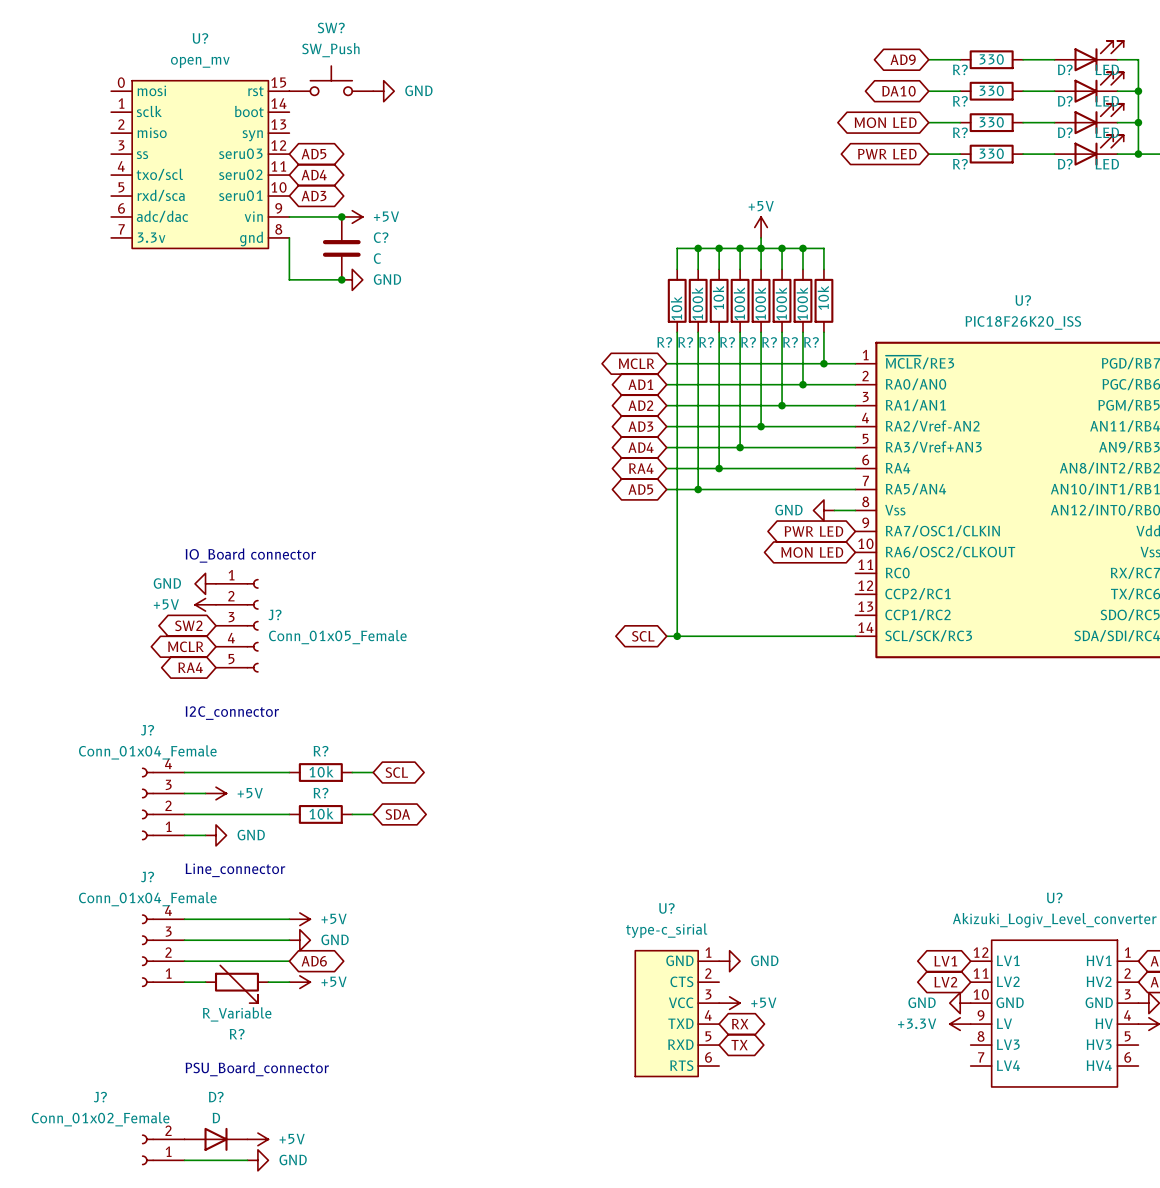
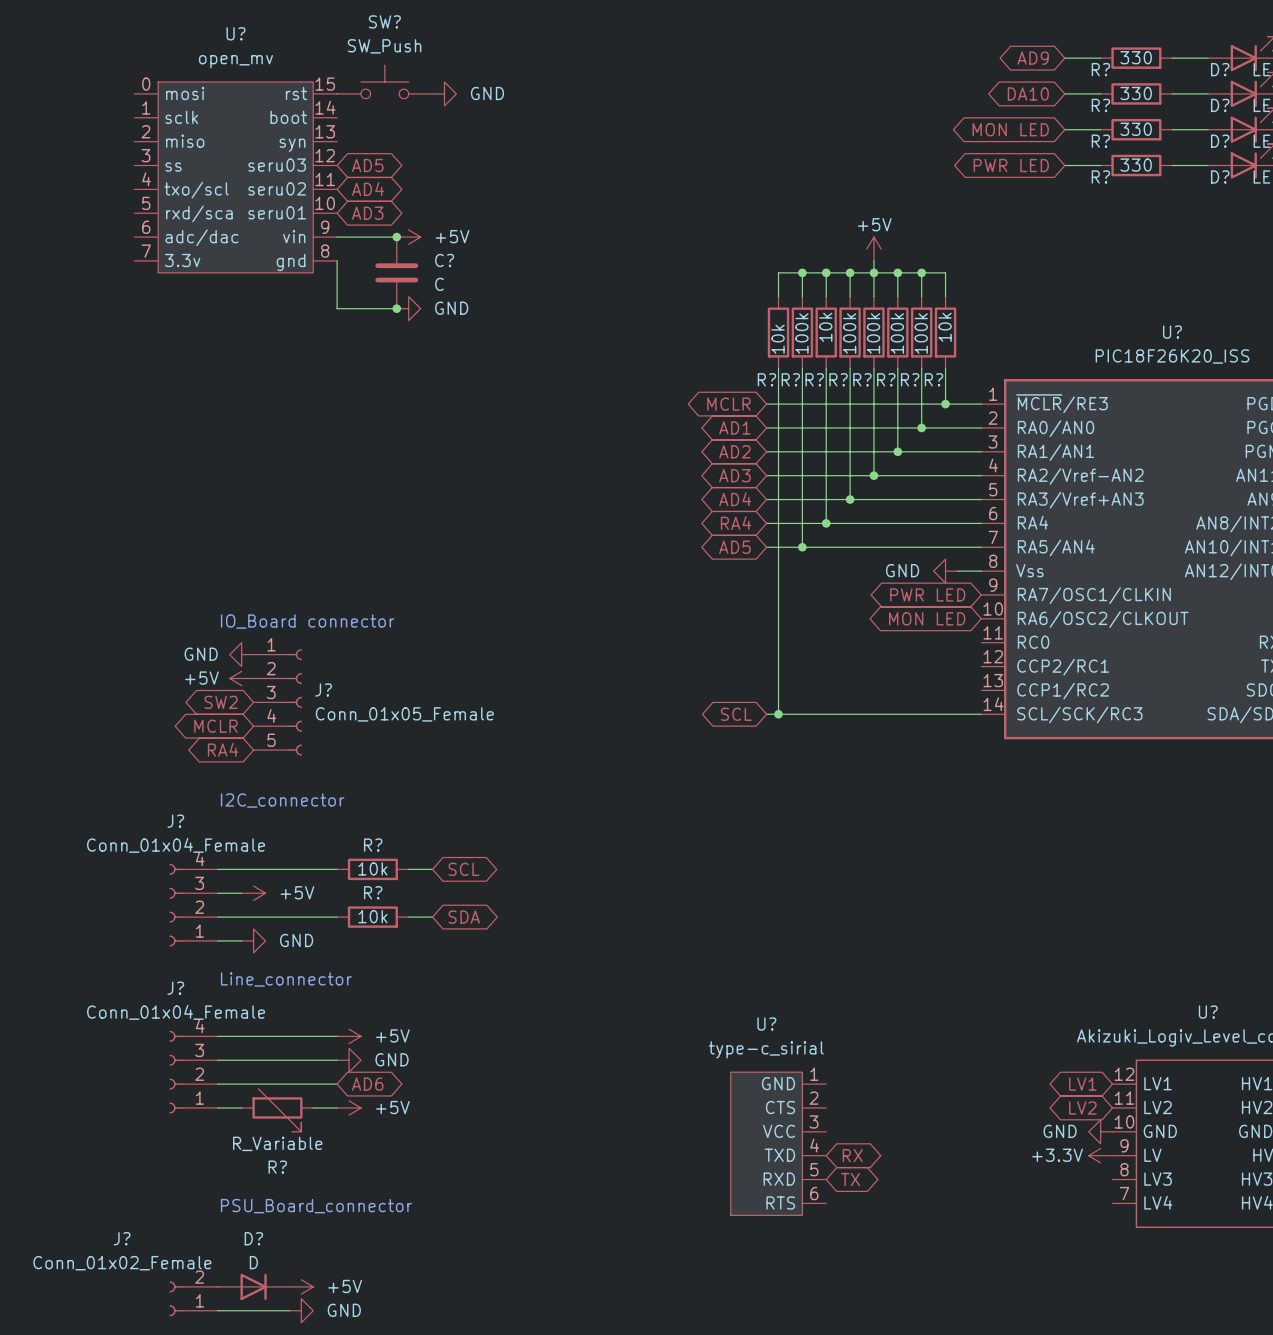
power symbol: GND (729, 961) -> none
power symbol: +5V (729, 1003) -> none

